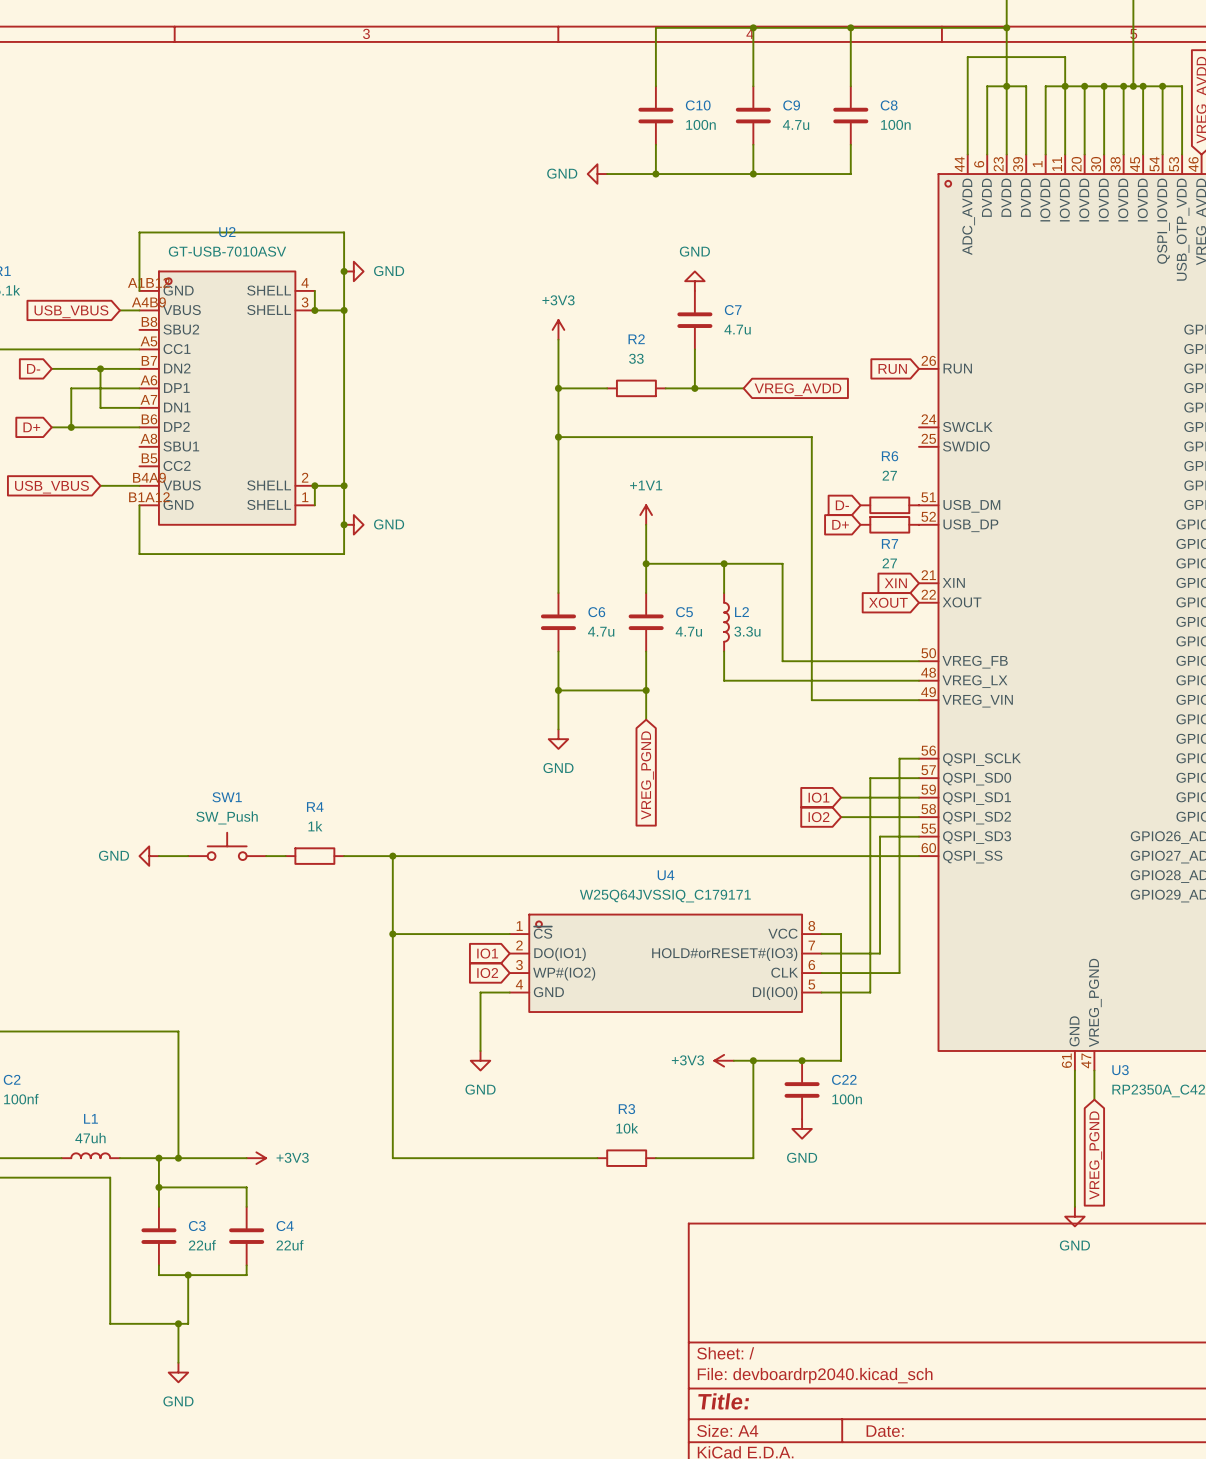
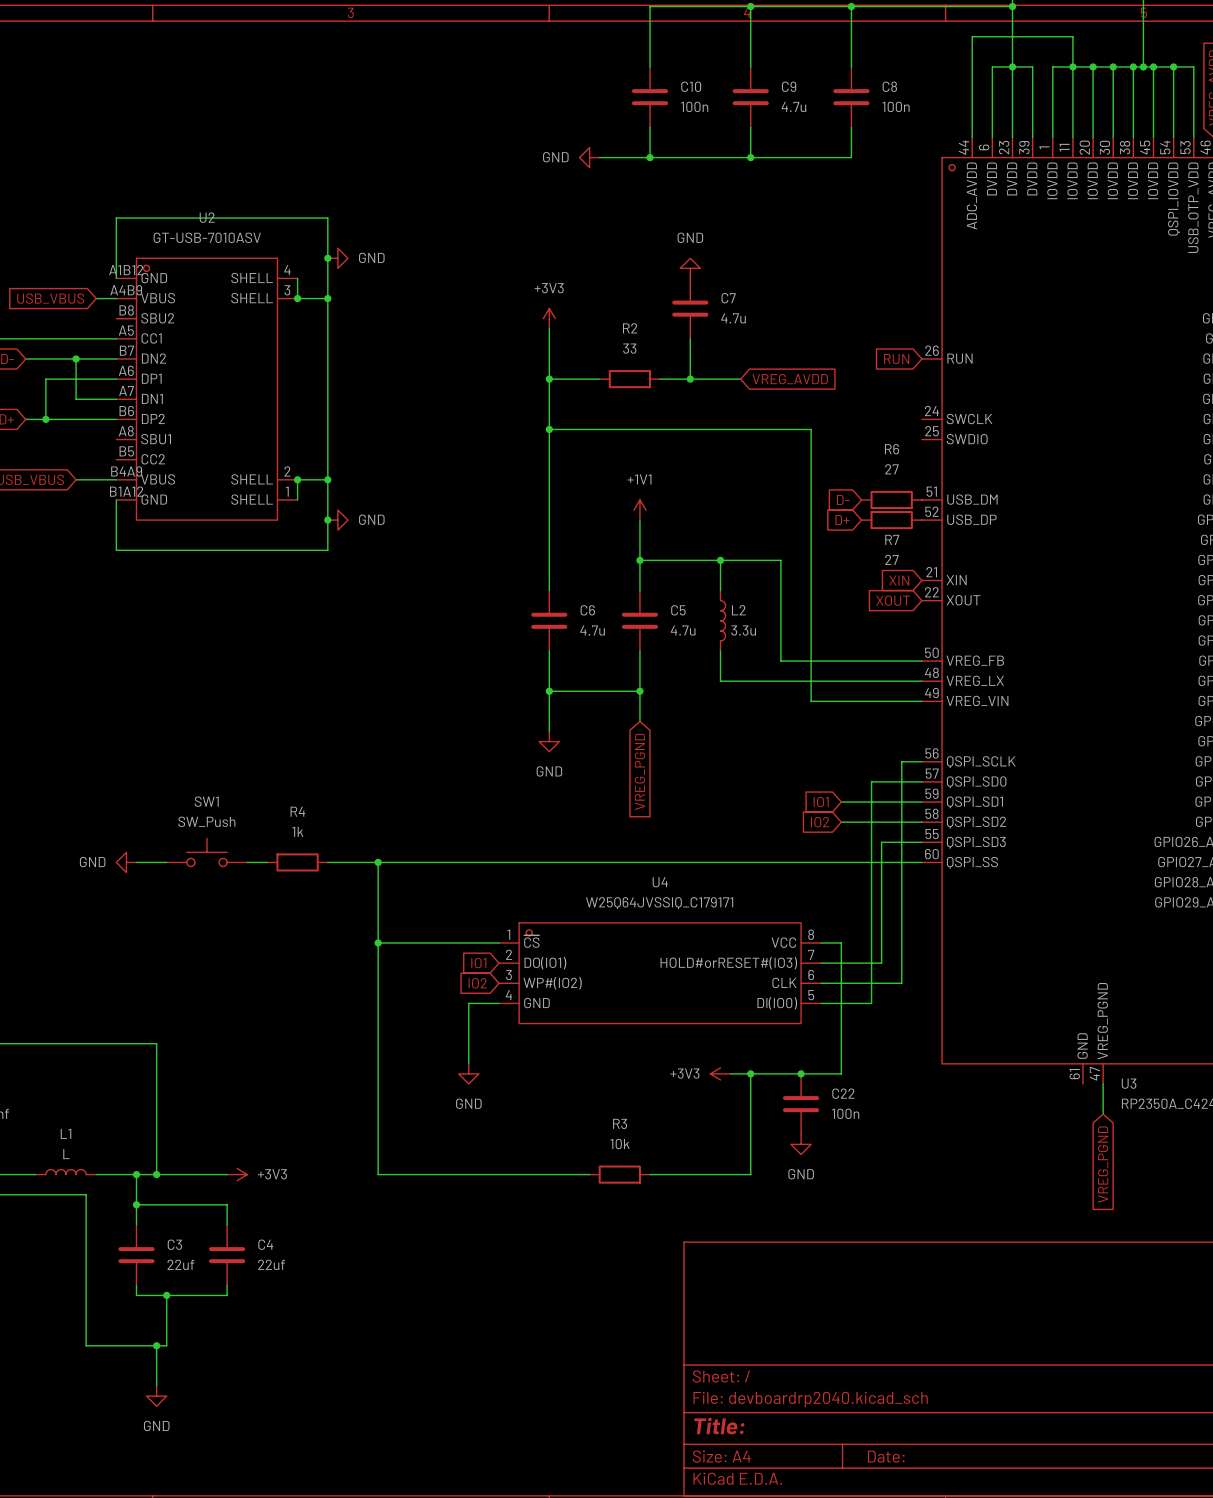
wire: (1074, 1070) (1074, 1206) -> none
L1 value: 47uh (90, 1138) -> L (66, 1154)
power symbol: GND (1074, 1216) -> none

